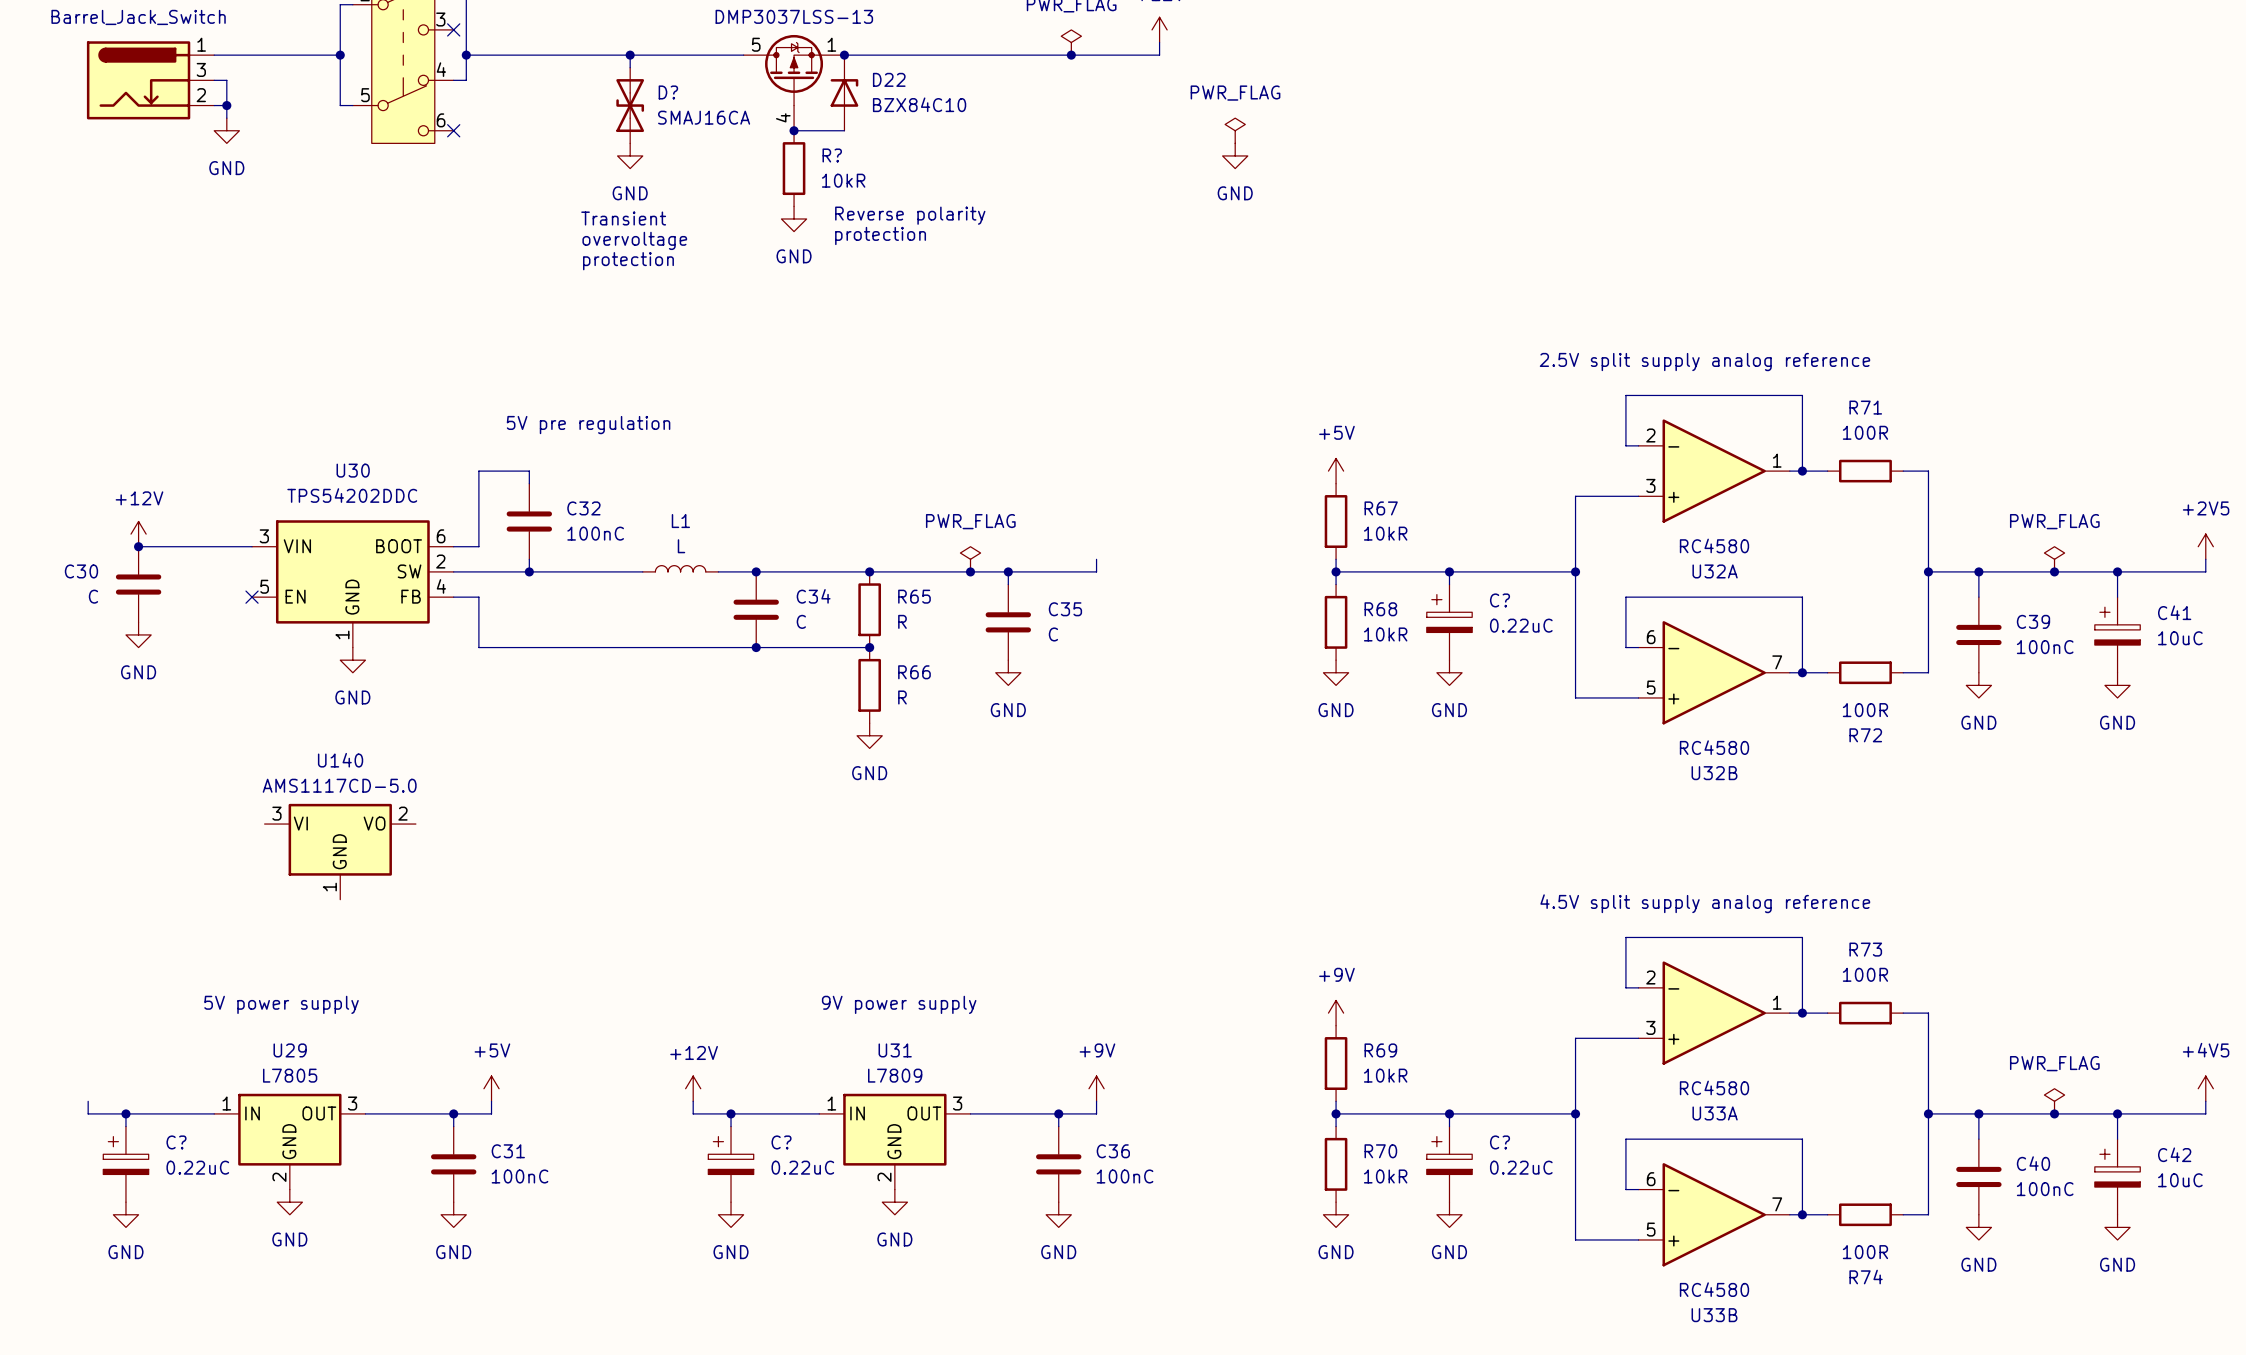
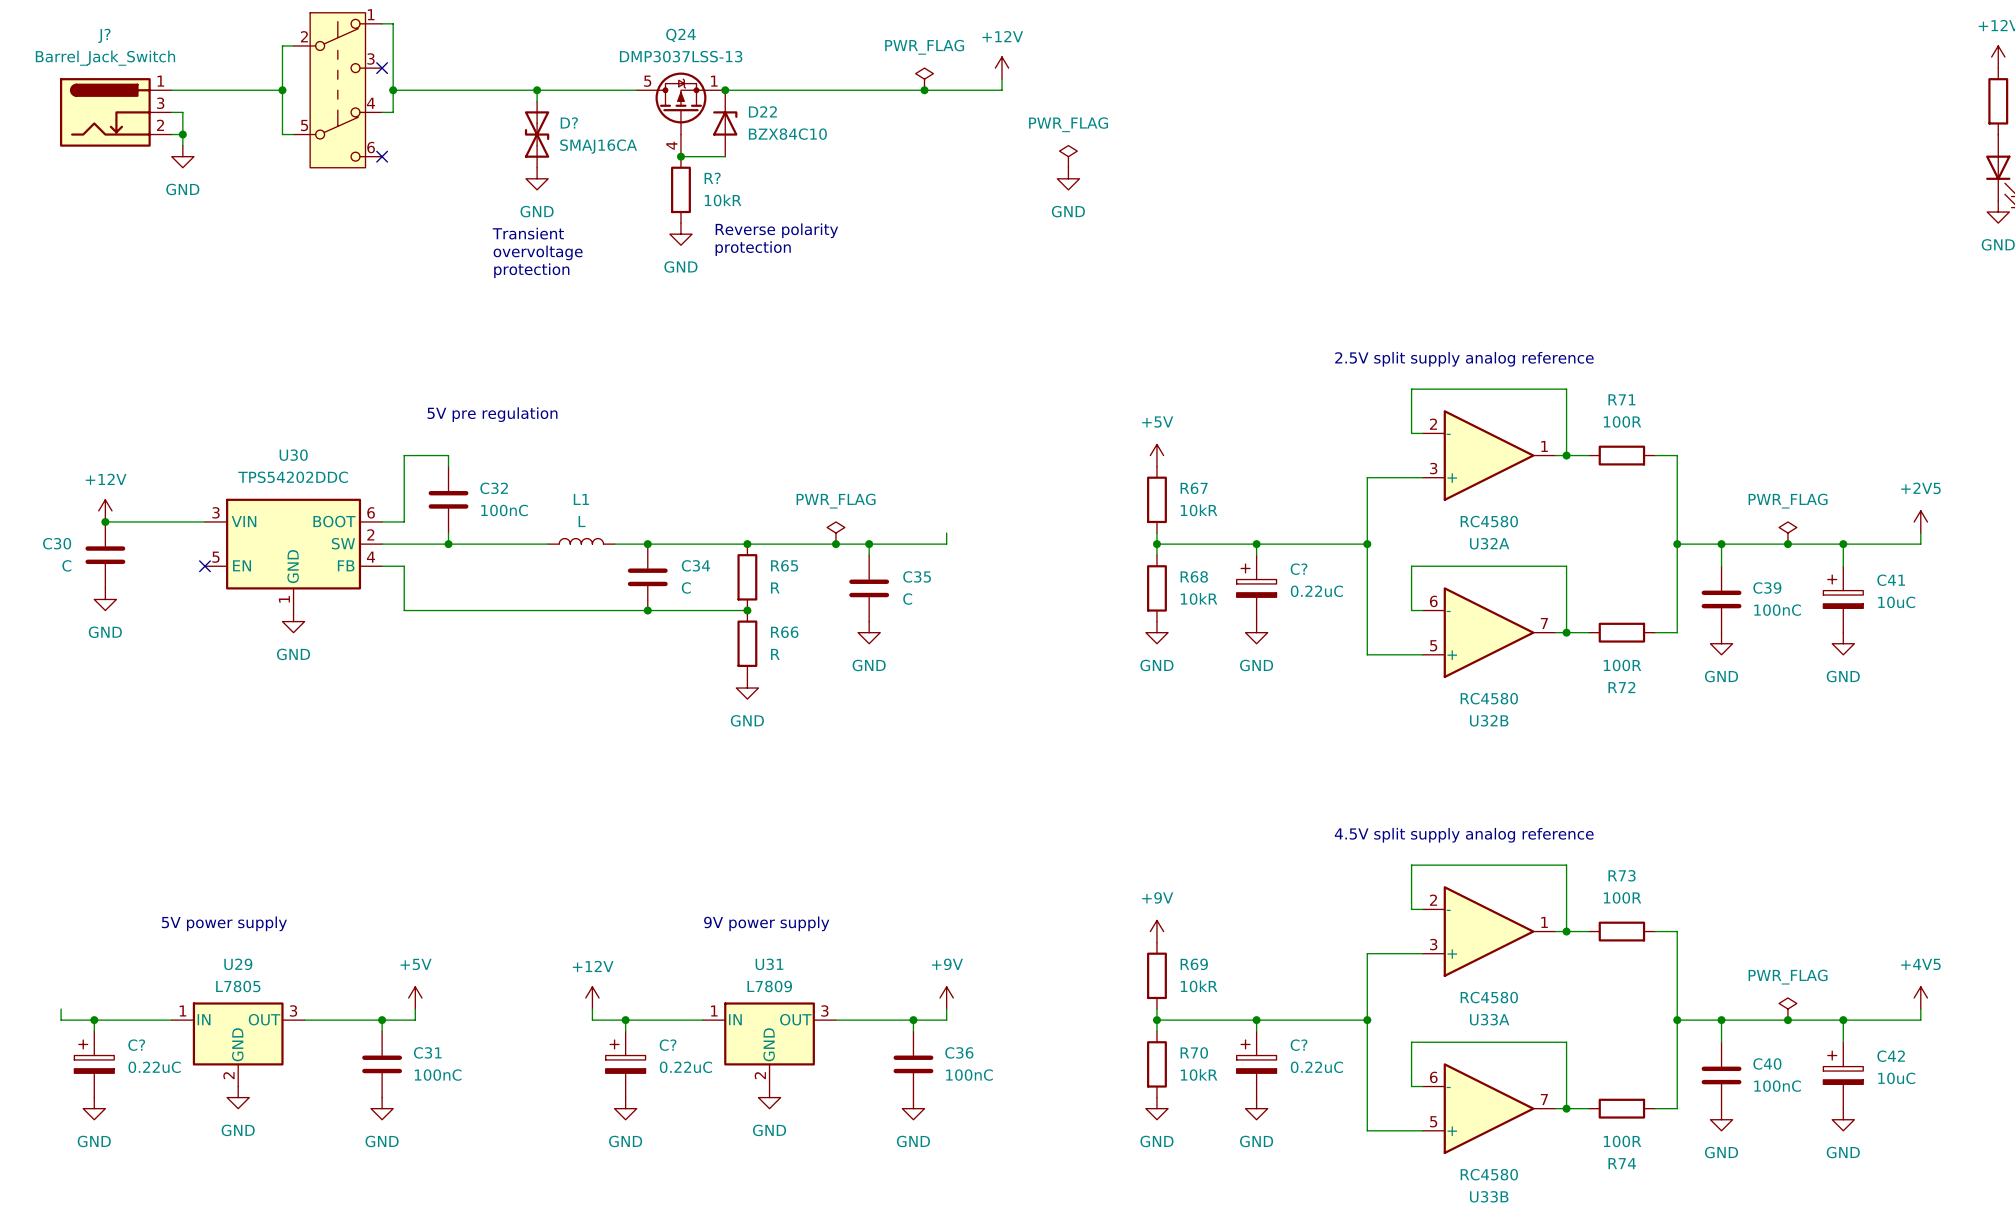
U140: AMS1117CD-5.0 (340, 851) -> none

